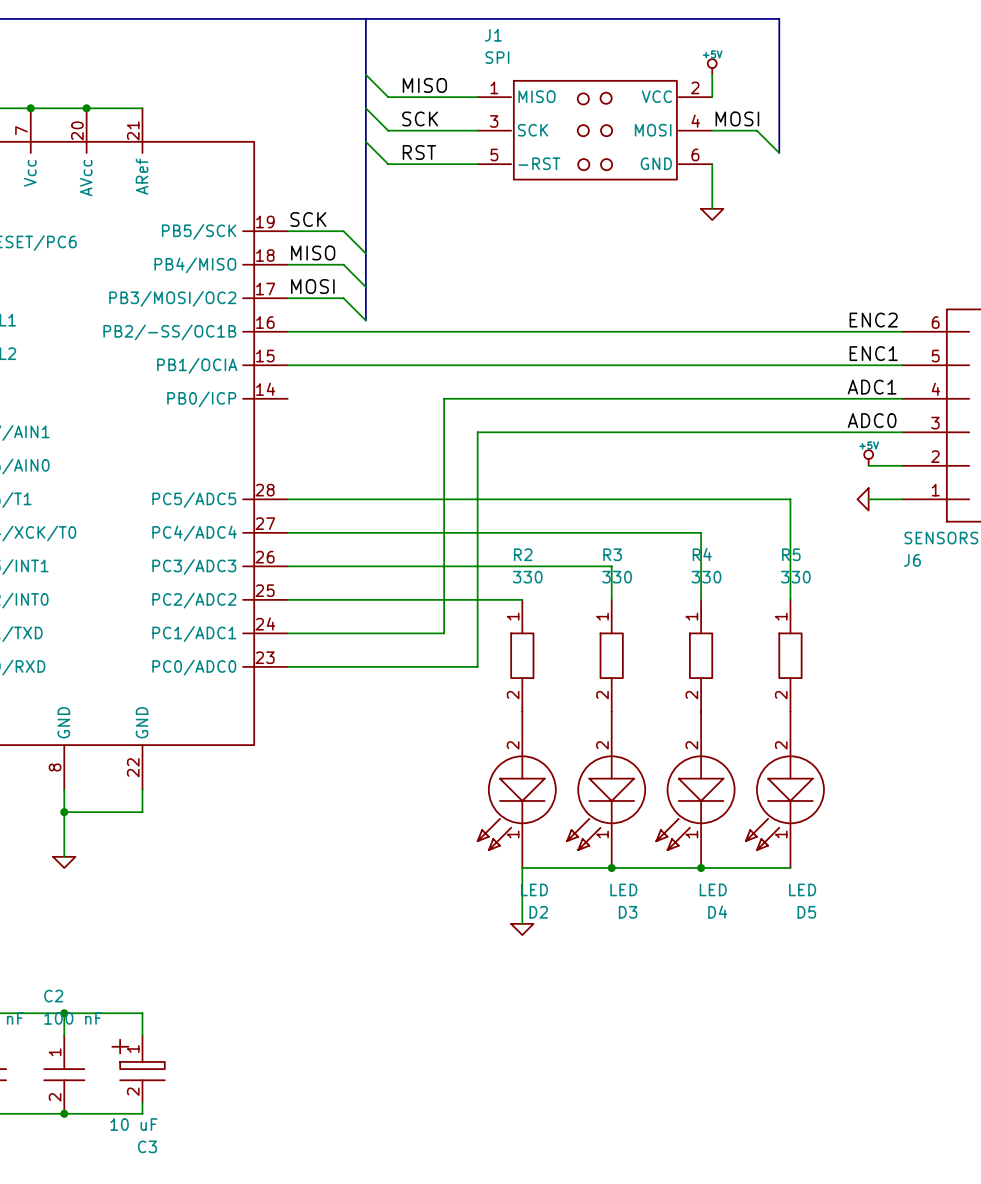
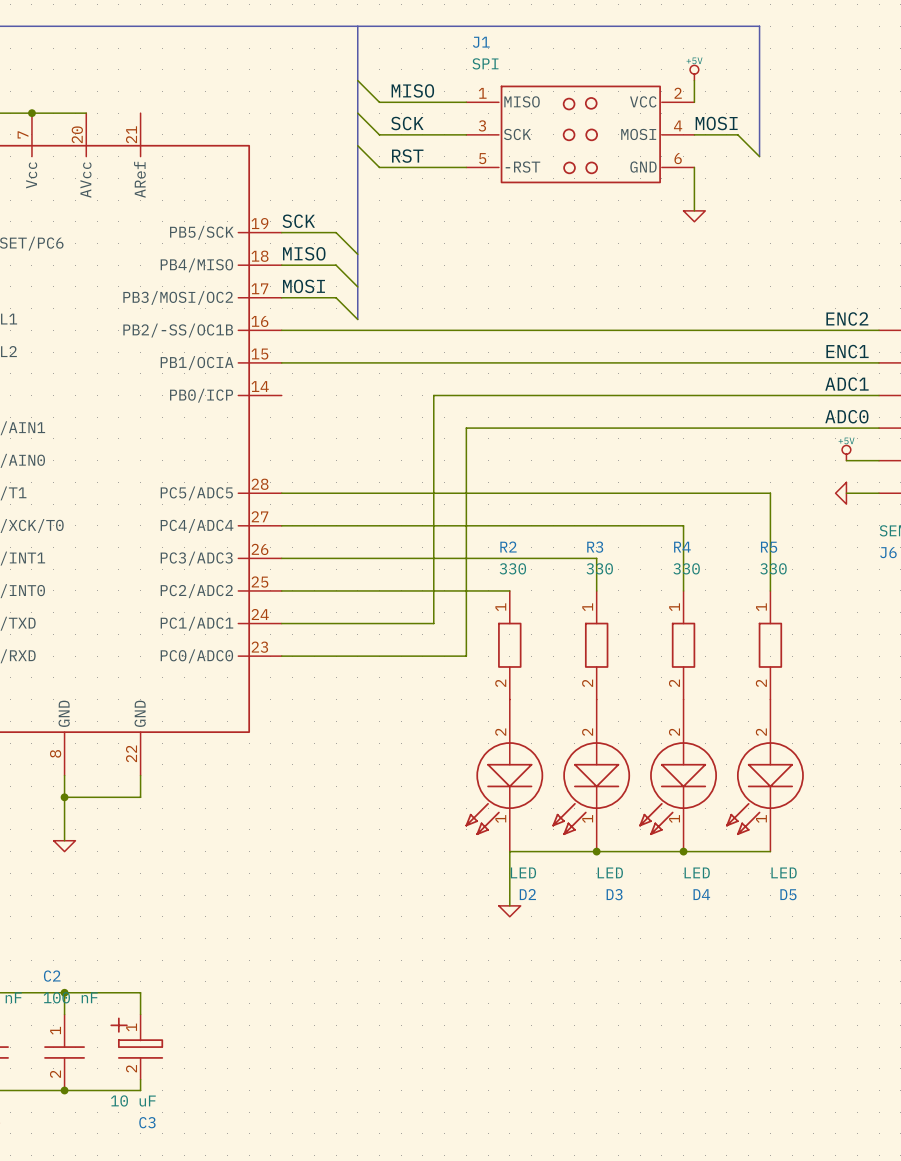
wire: (86, 108) (142, 108) -> none
junction: (86, 108) -> none

